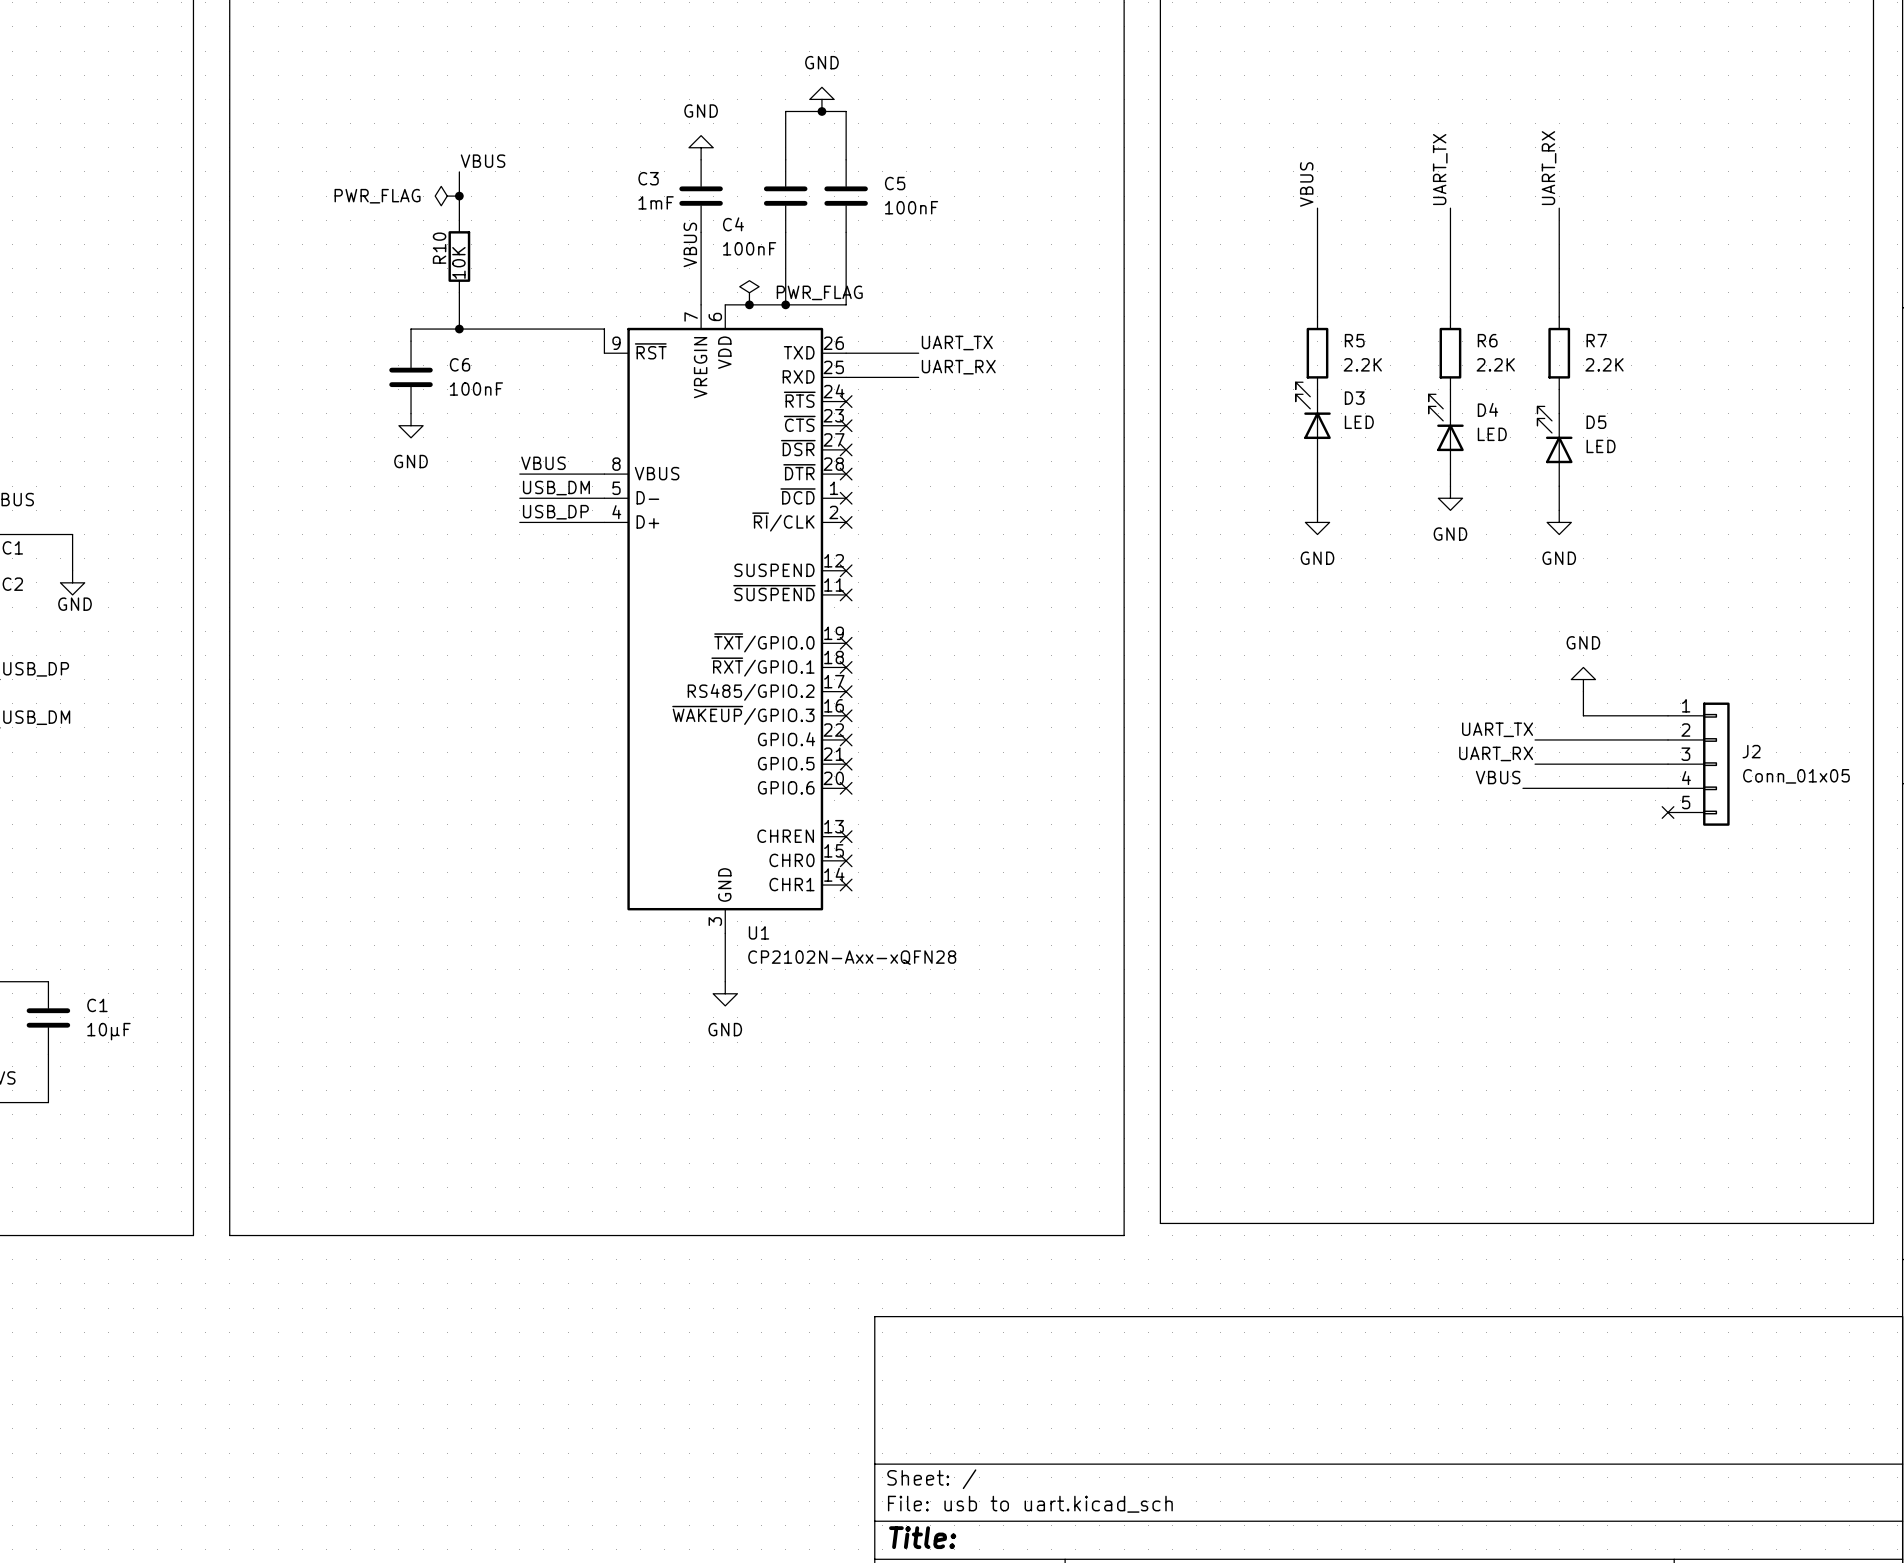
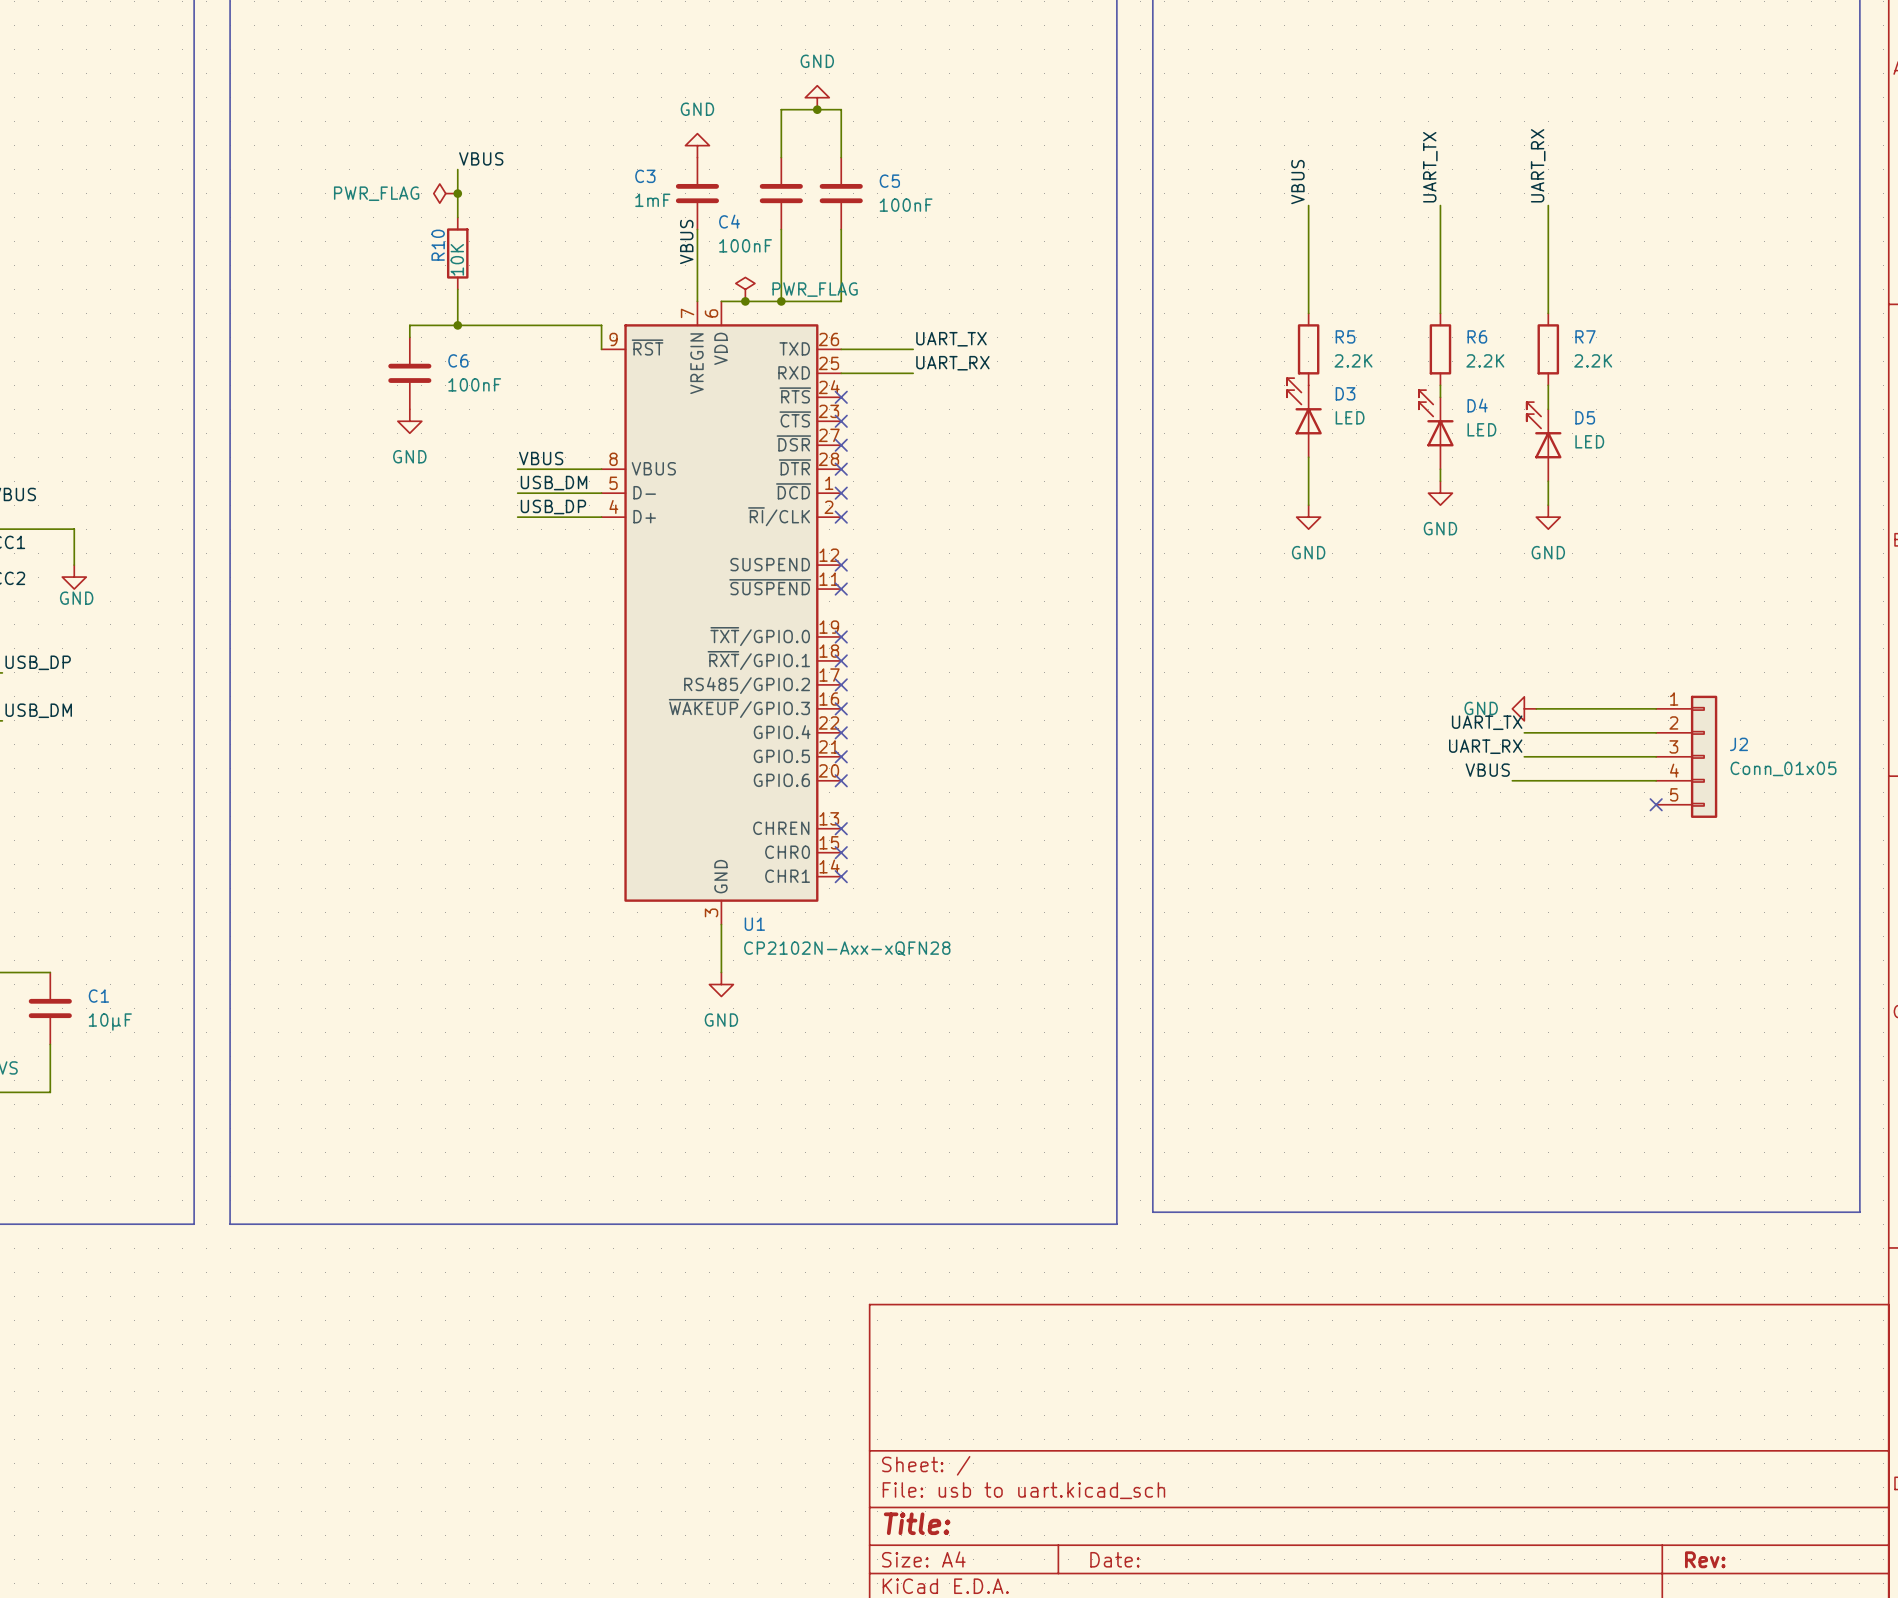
power symbol rotation: 0° (1583, 679) -> 90° counterclockwise (1524, 708)
power symbol position: GND (1583, 679) -> GND (1524, 708)
wire: (1583, 691) (1583, 715) -> (1536, 708) (1572, 708)

